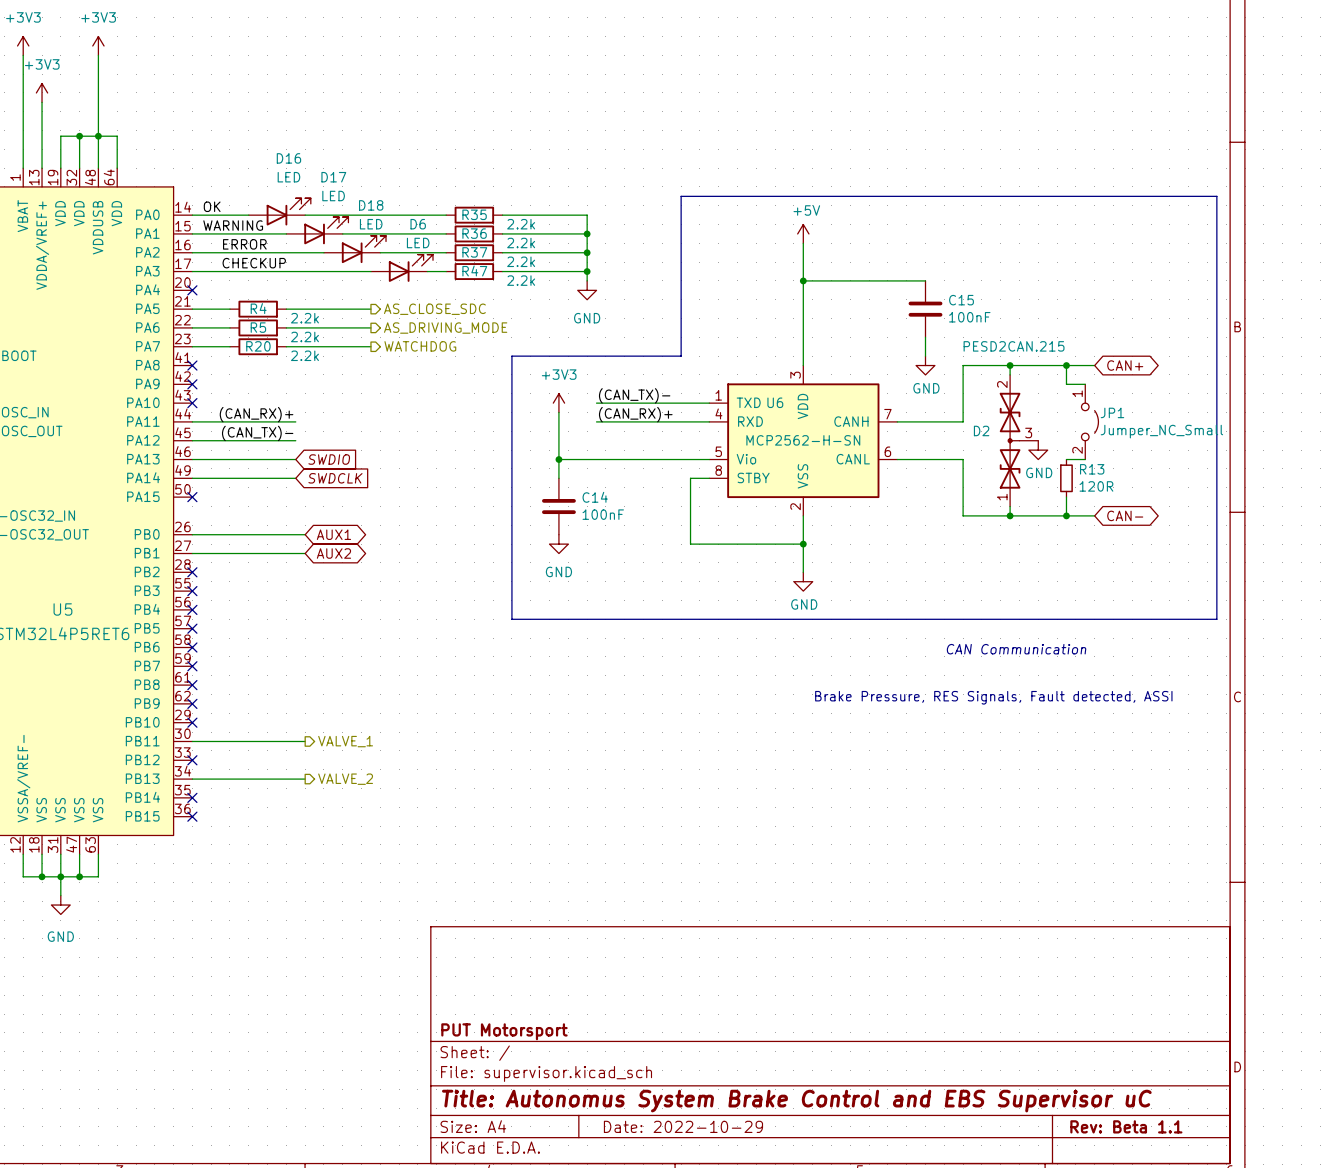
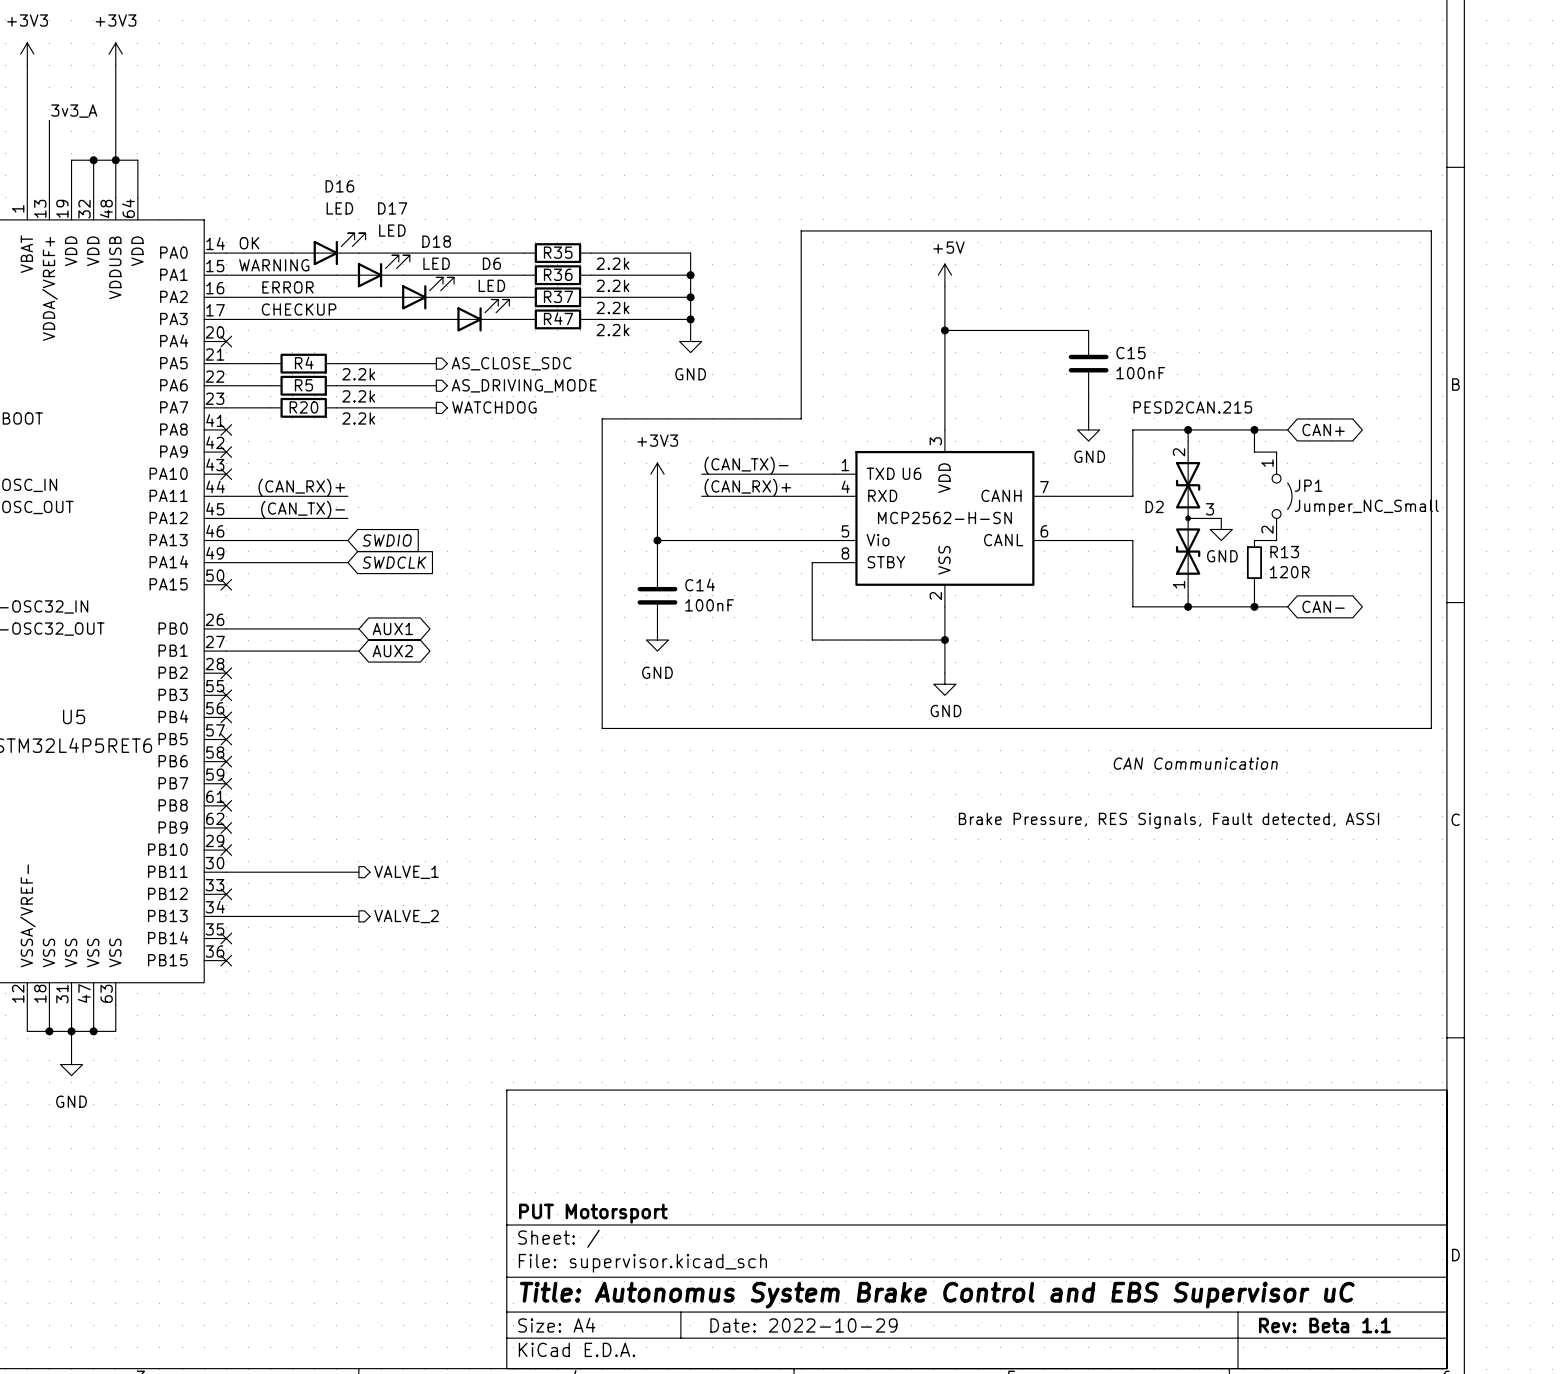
power symbol: +3V3 (42, 92) -> none
label: none -> 3v3_A (74, 111)

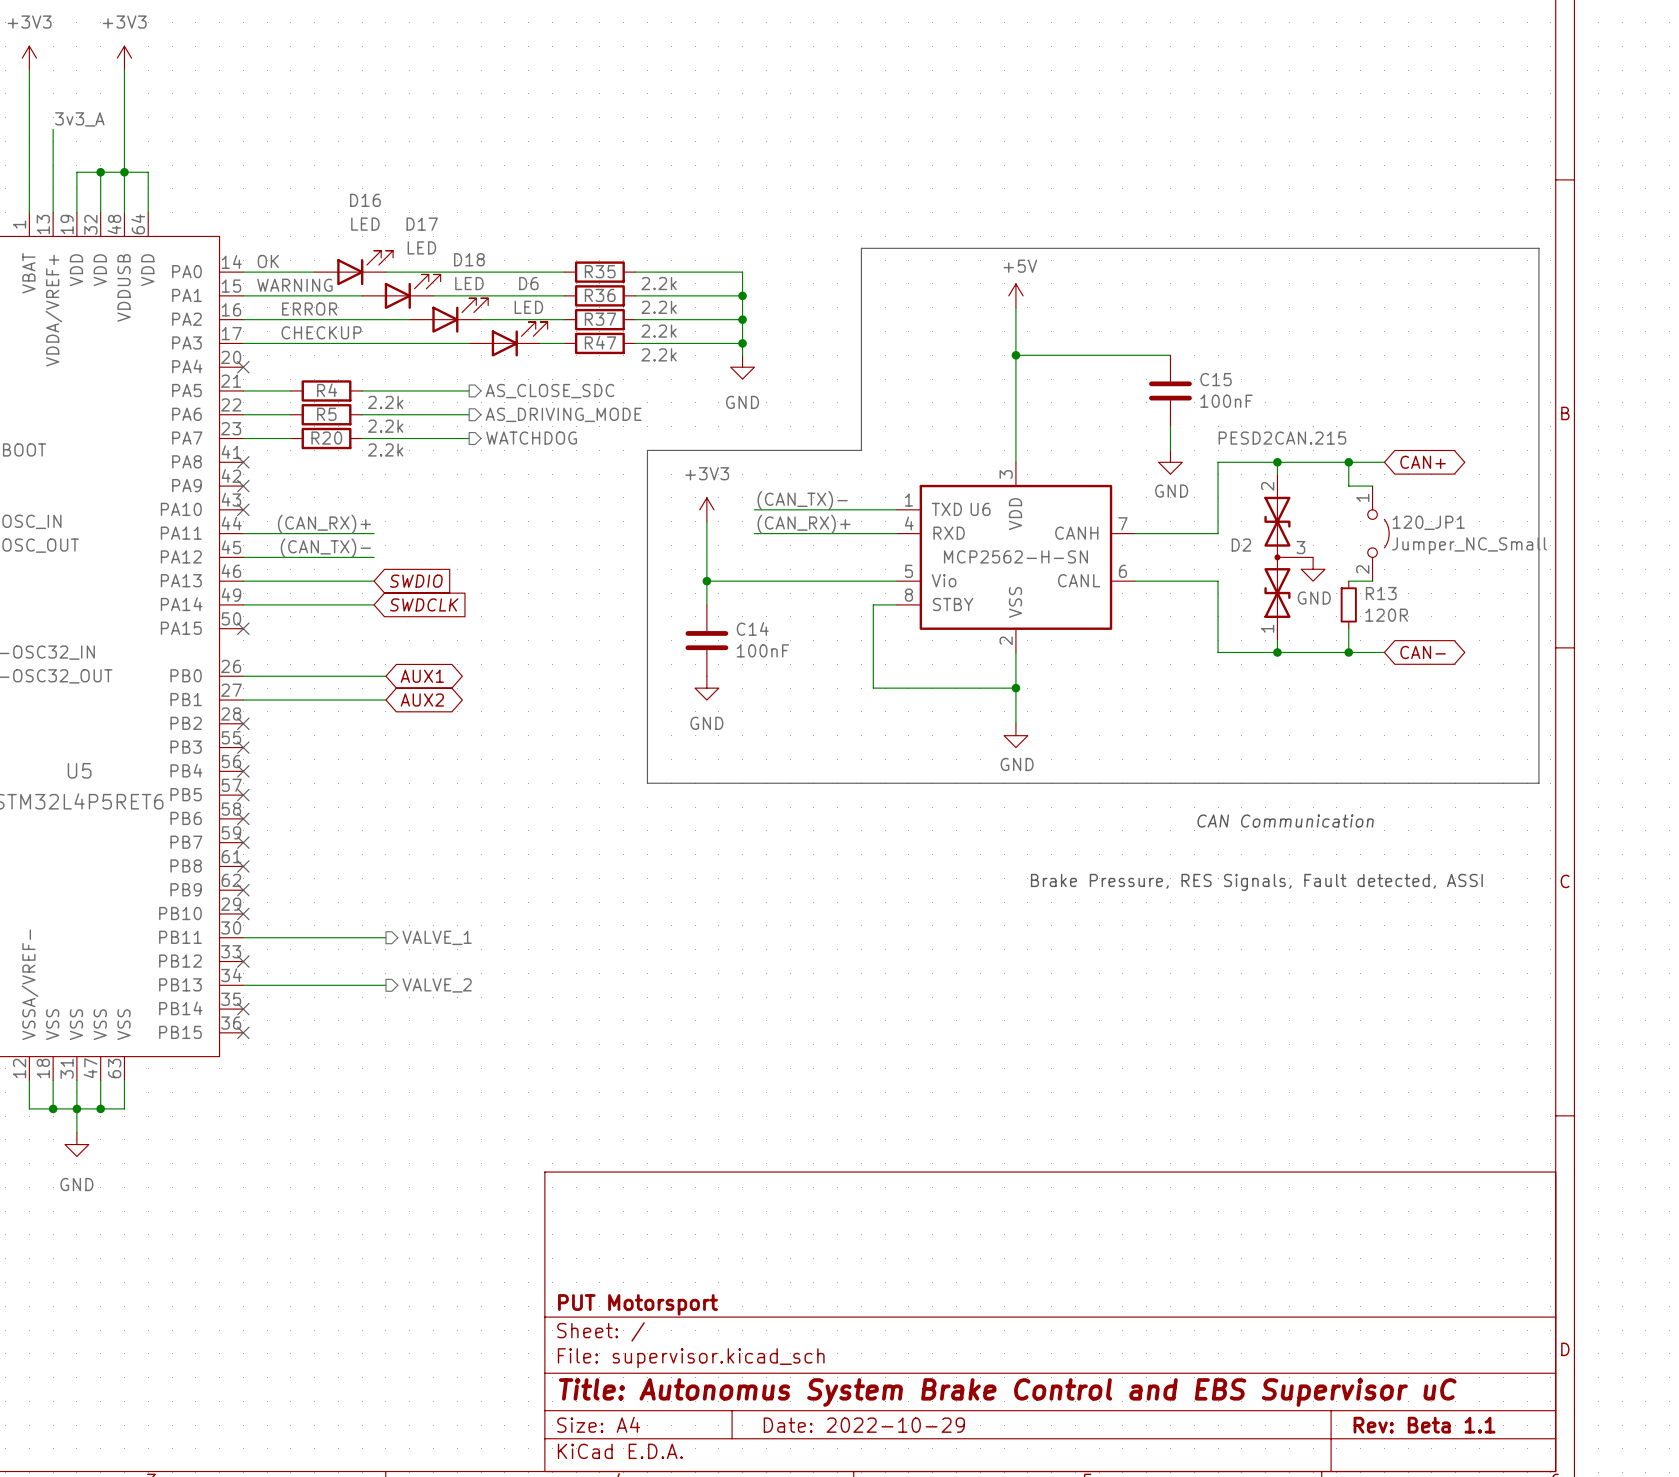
JP1 name: JP1 (1308, 485) -> 120_JP1 (1428, 522)

